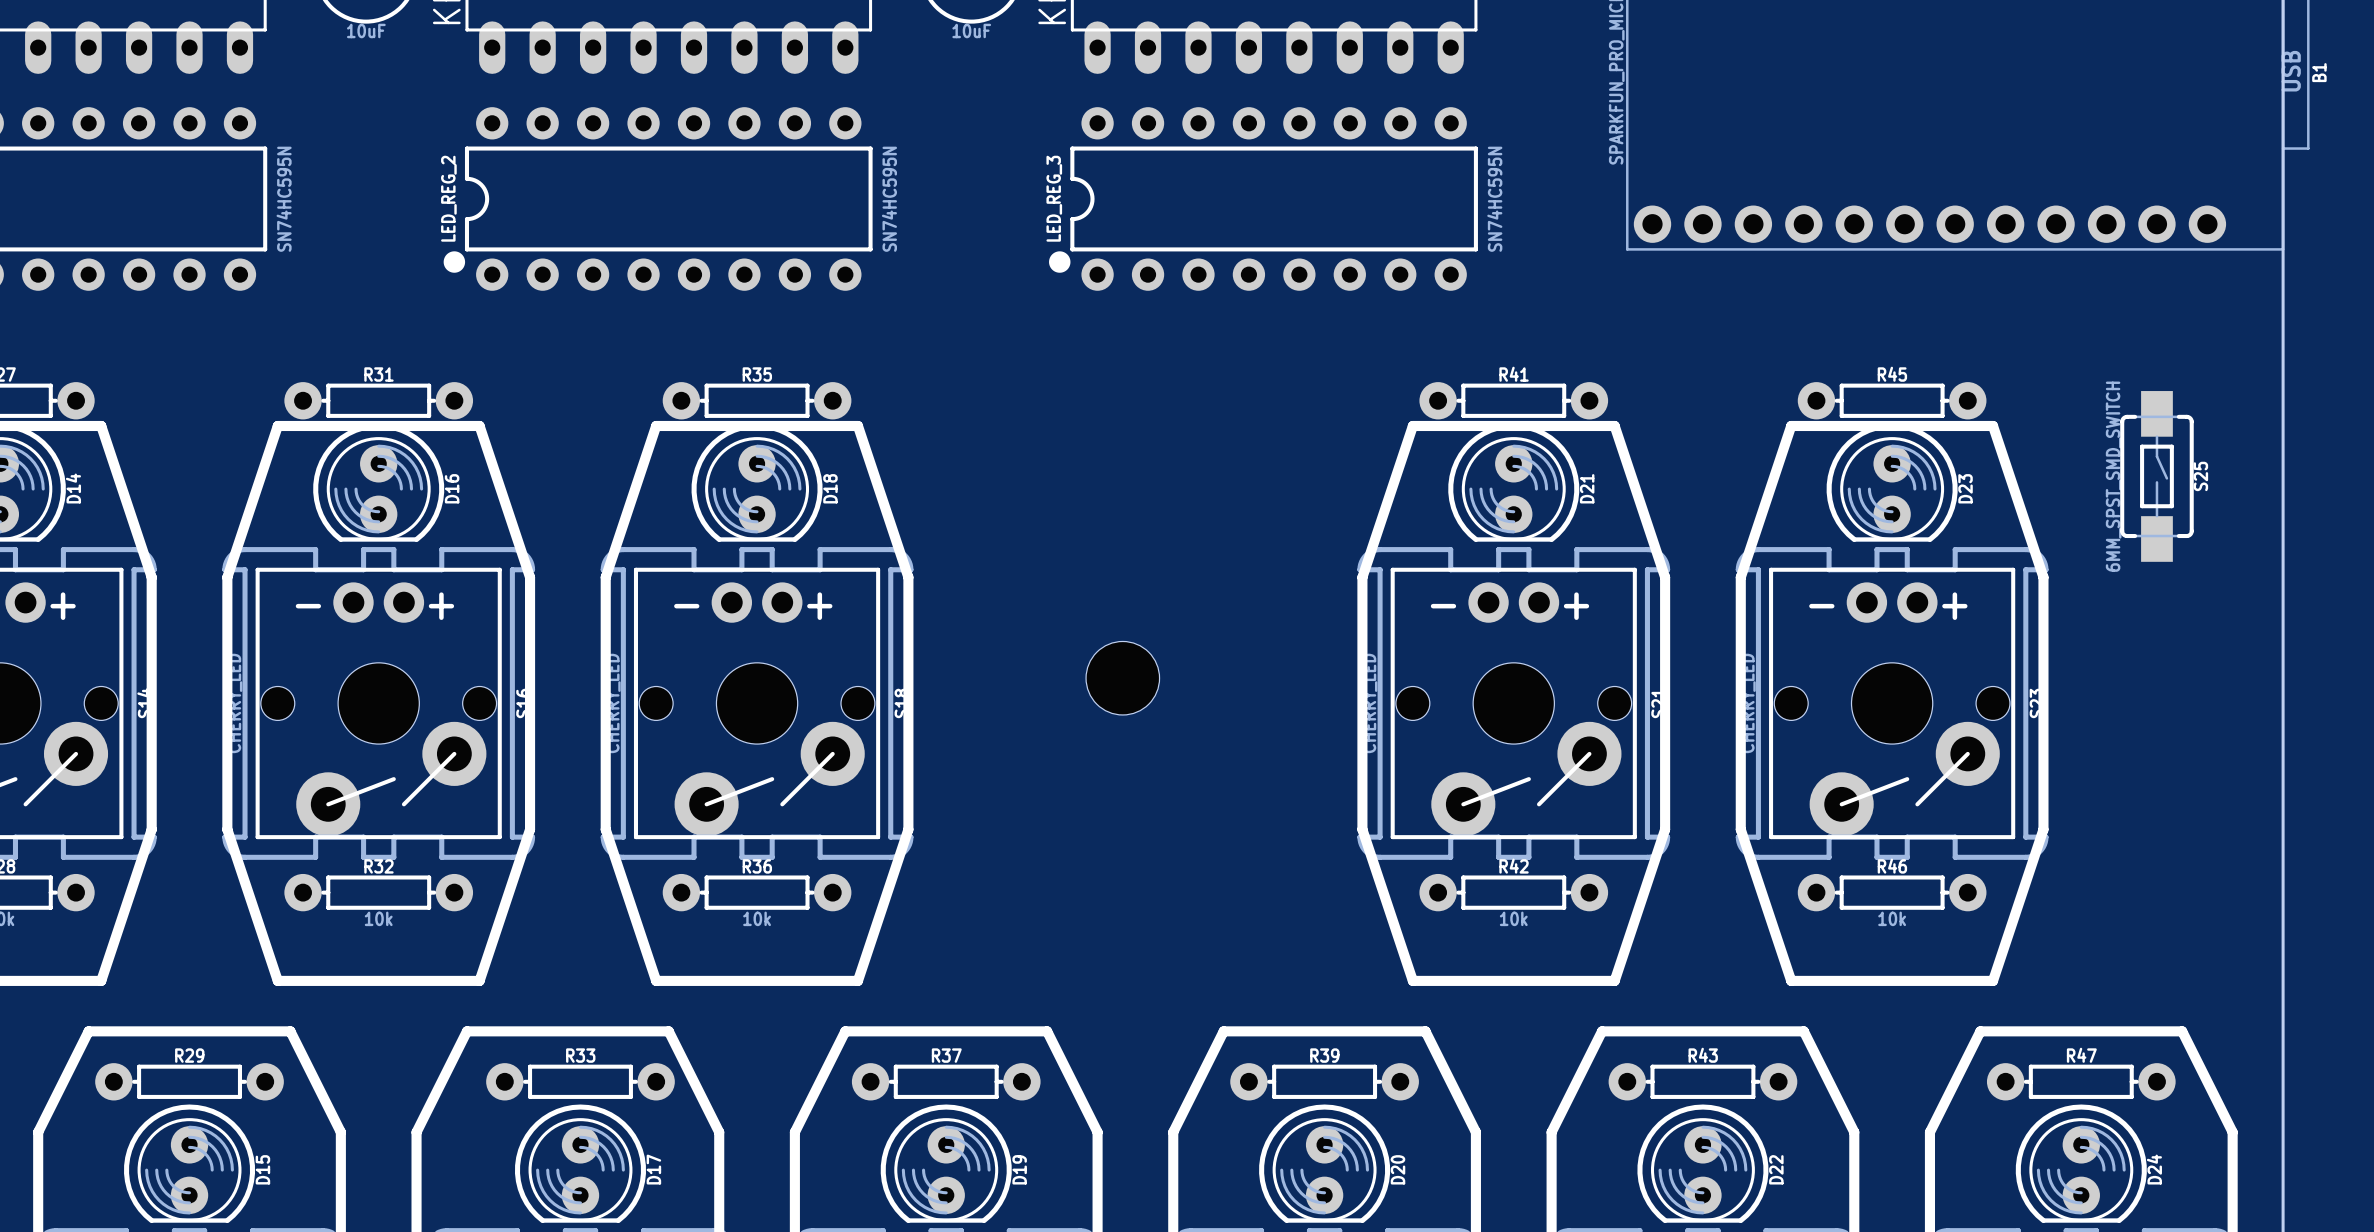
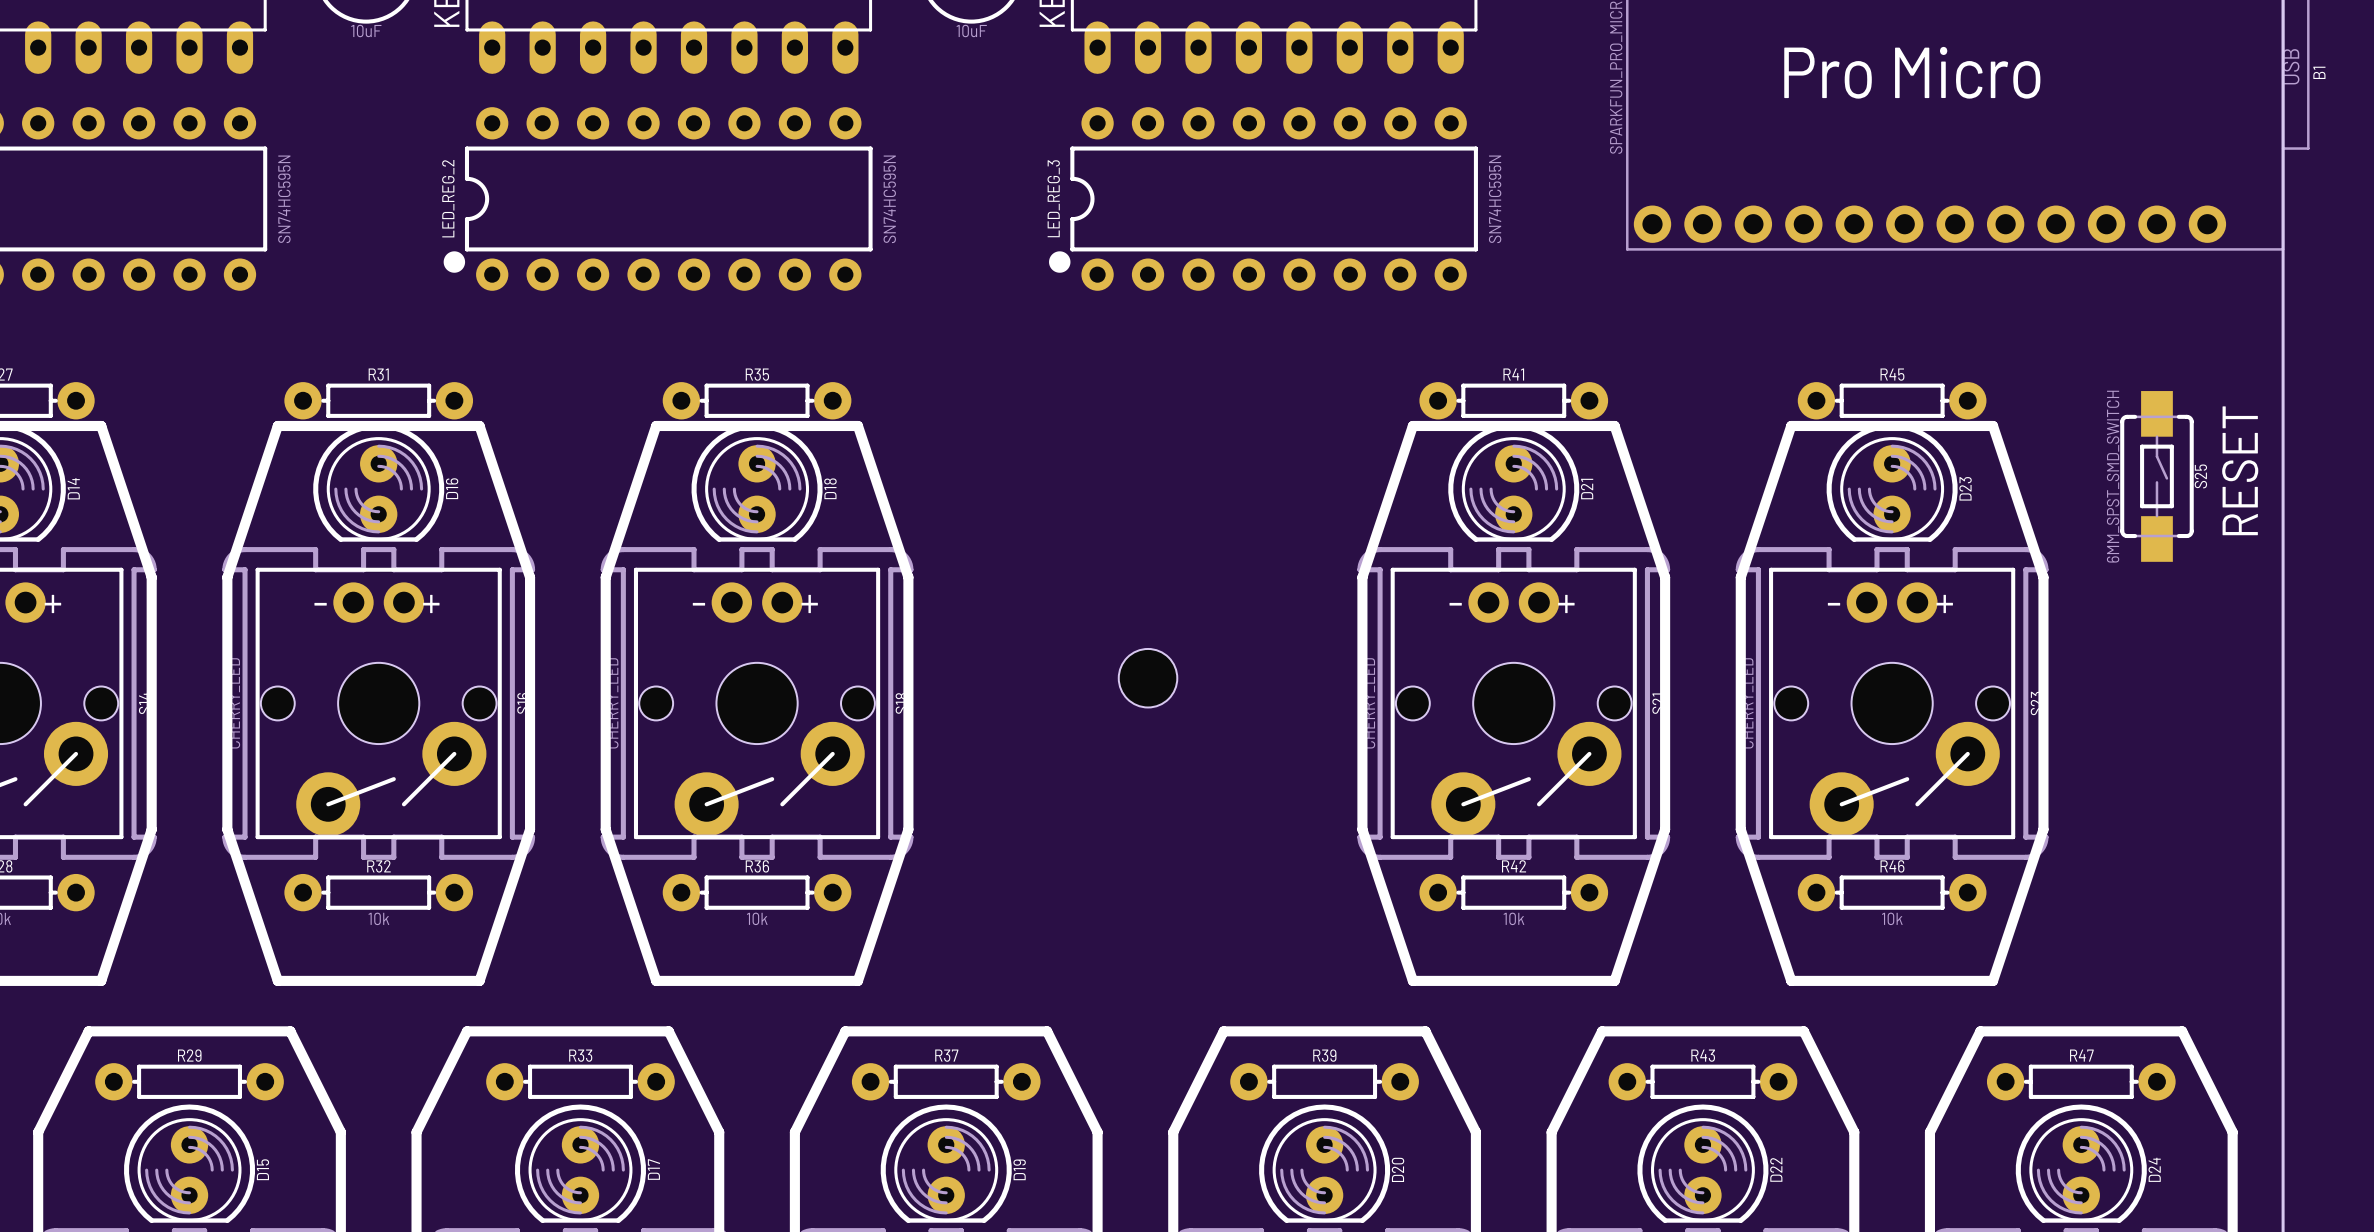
text: none -> Pro Micro (1912, 72)
text: none -> RESET (2240, 470)
hole: (1122, 678) -> none
hole: none -> (1148, 678)

